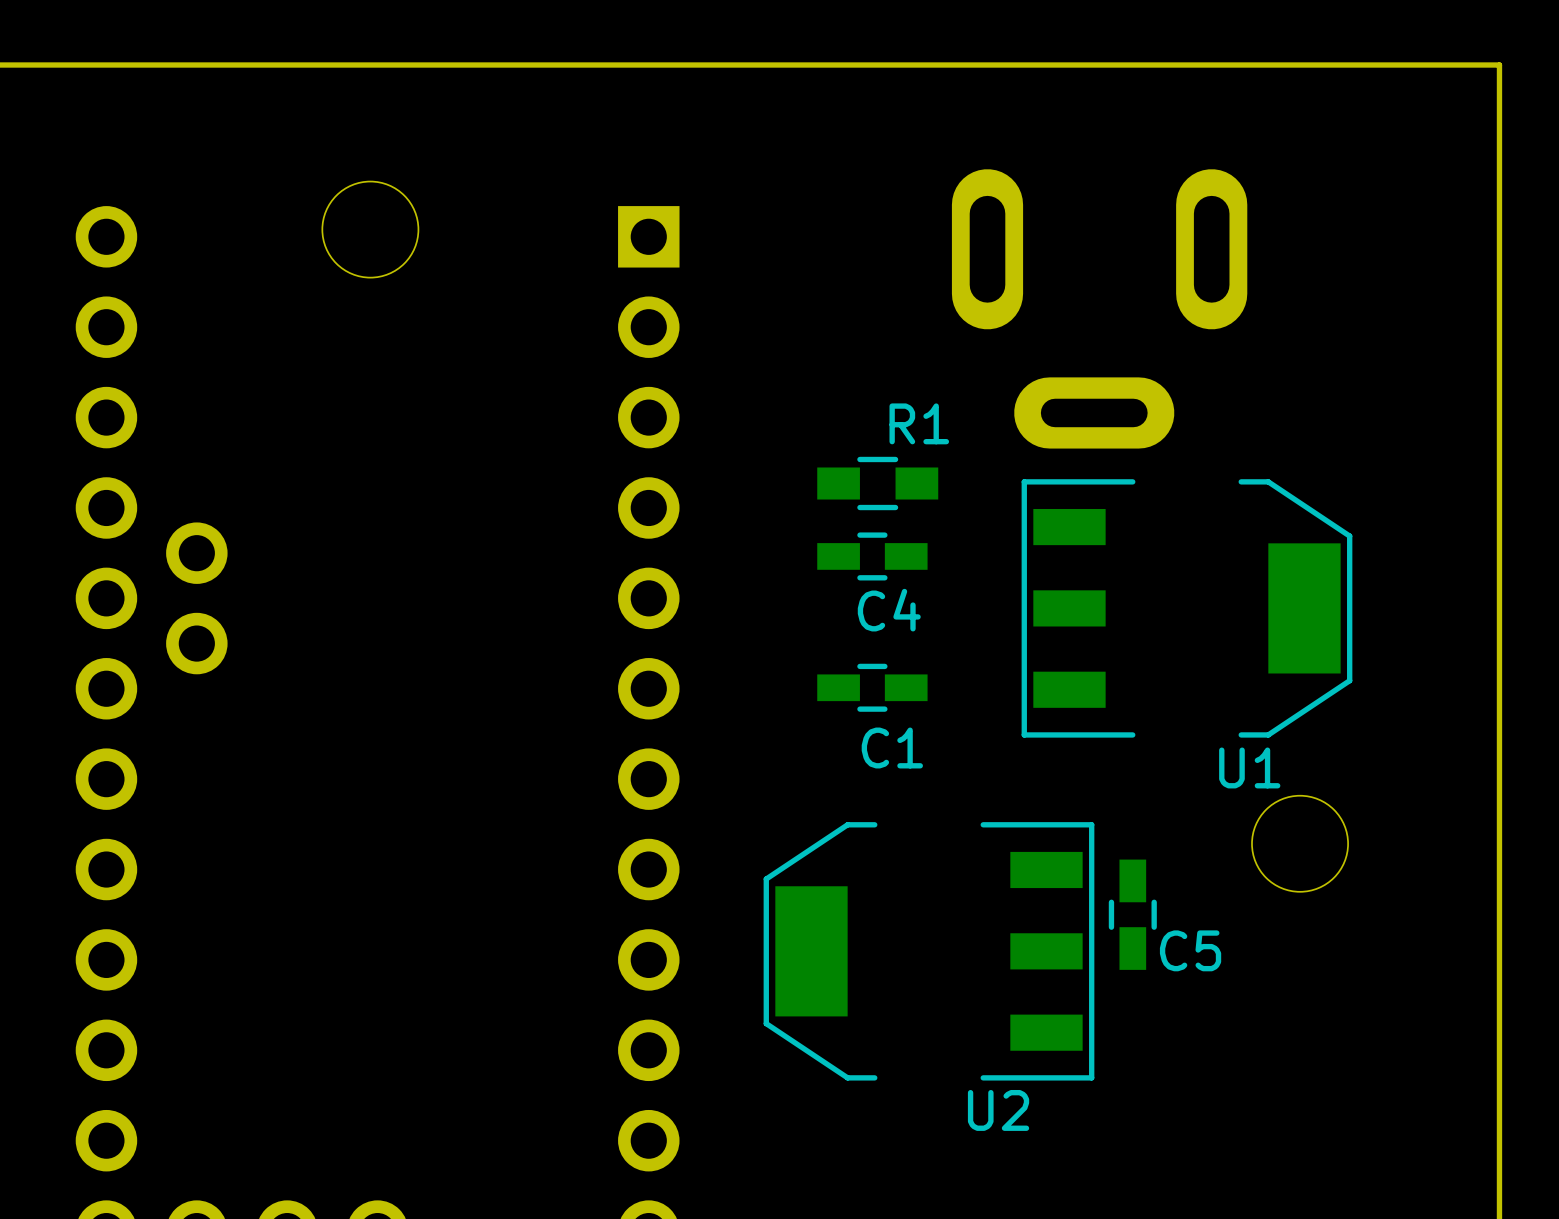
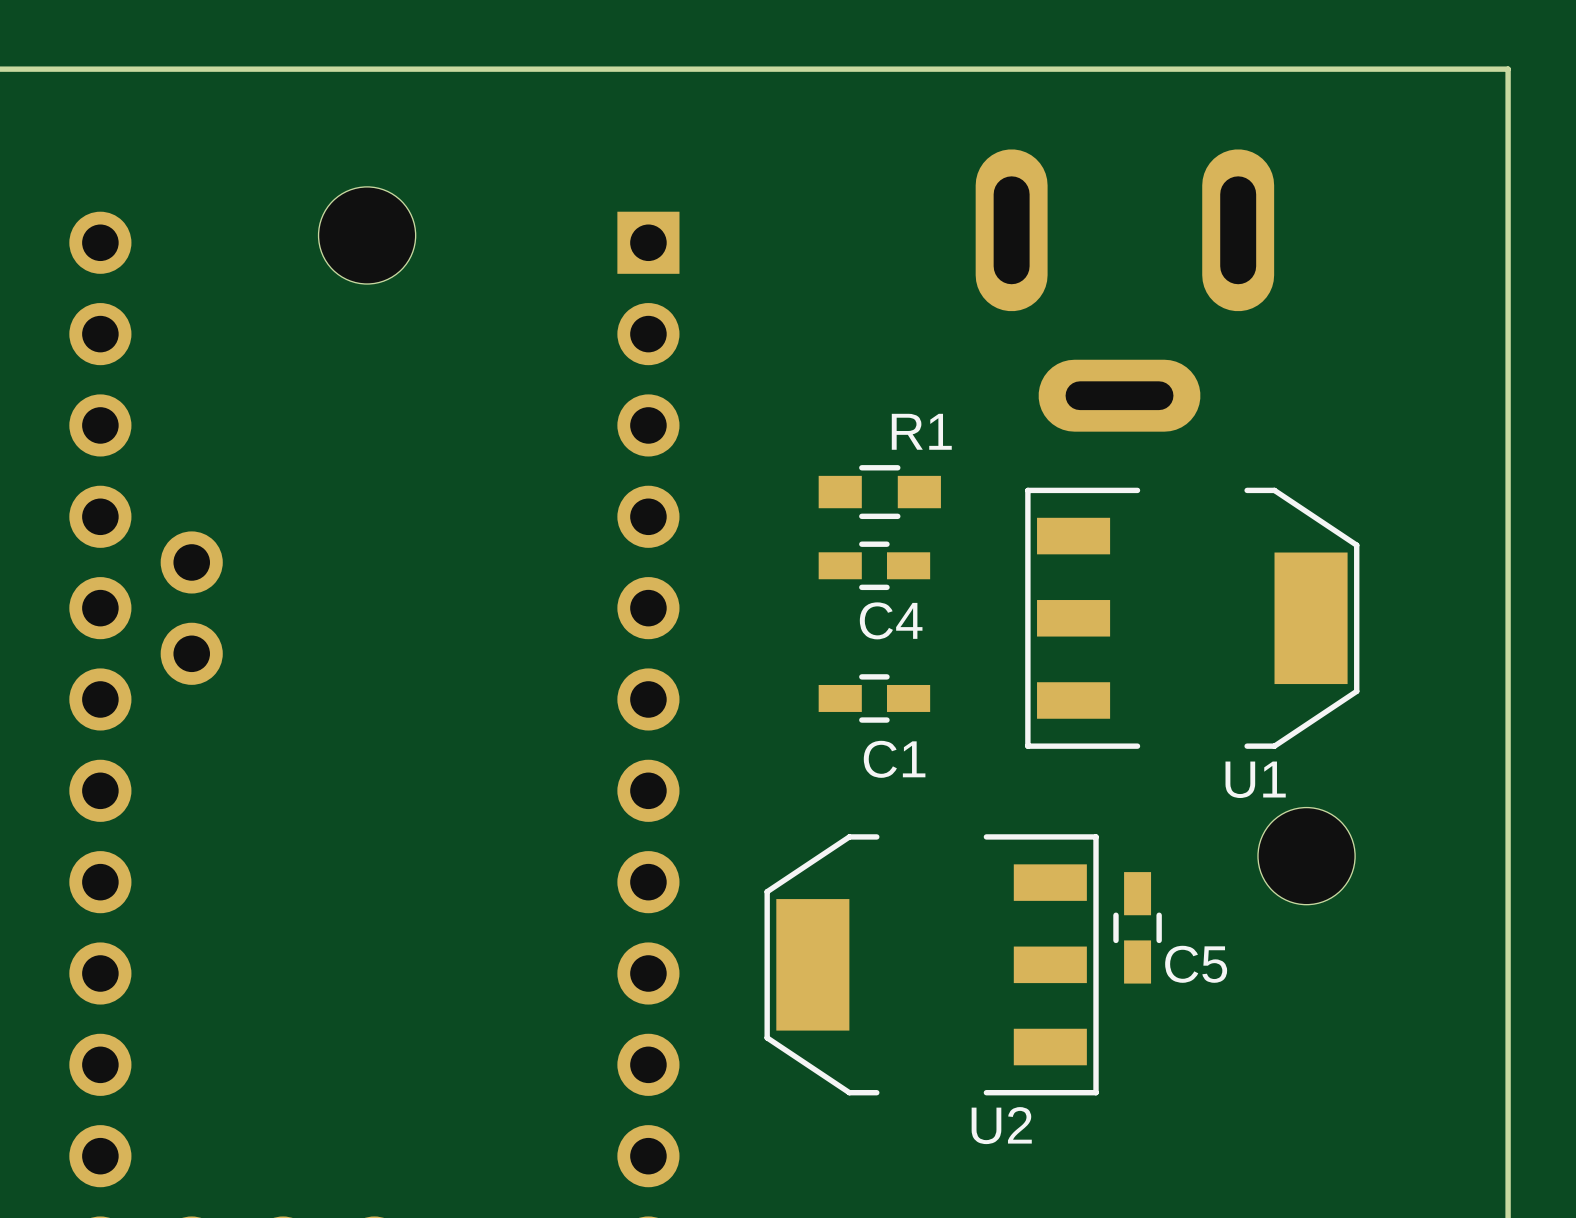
part position: (1099, 308) -> (1124, 290)

